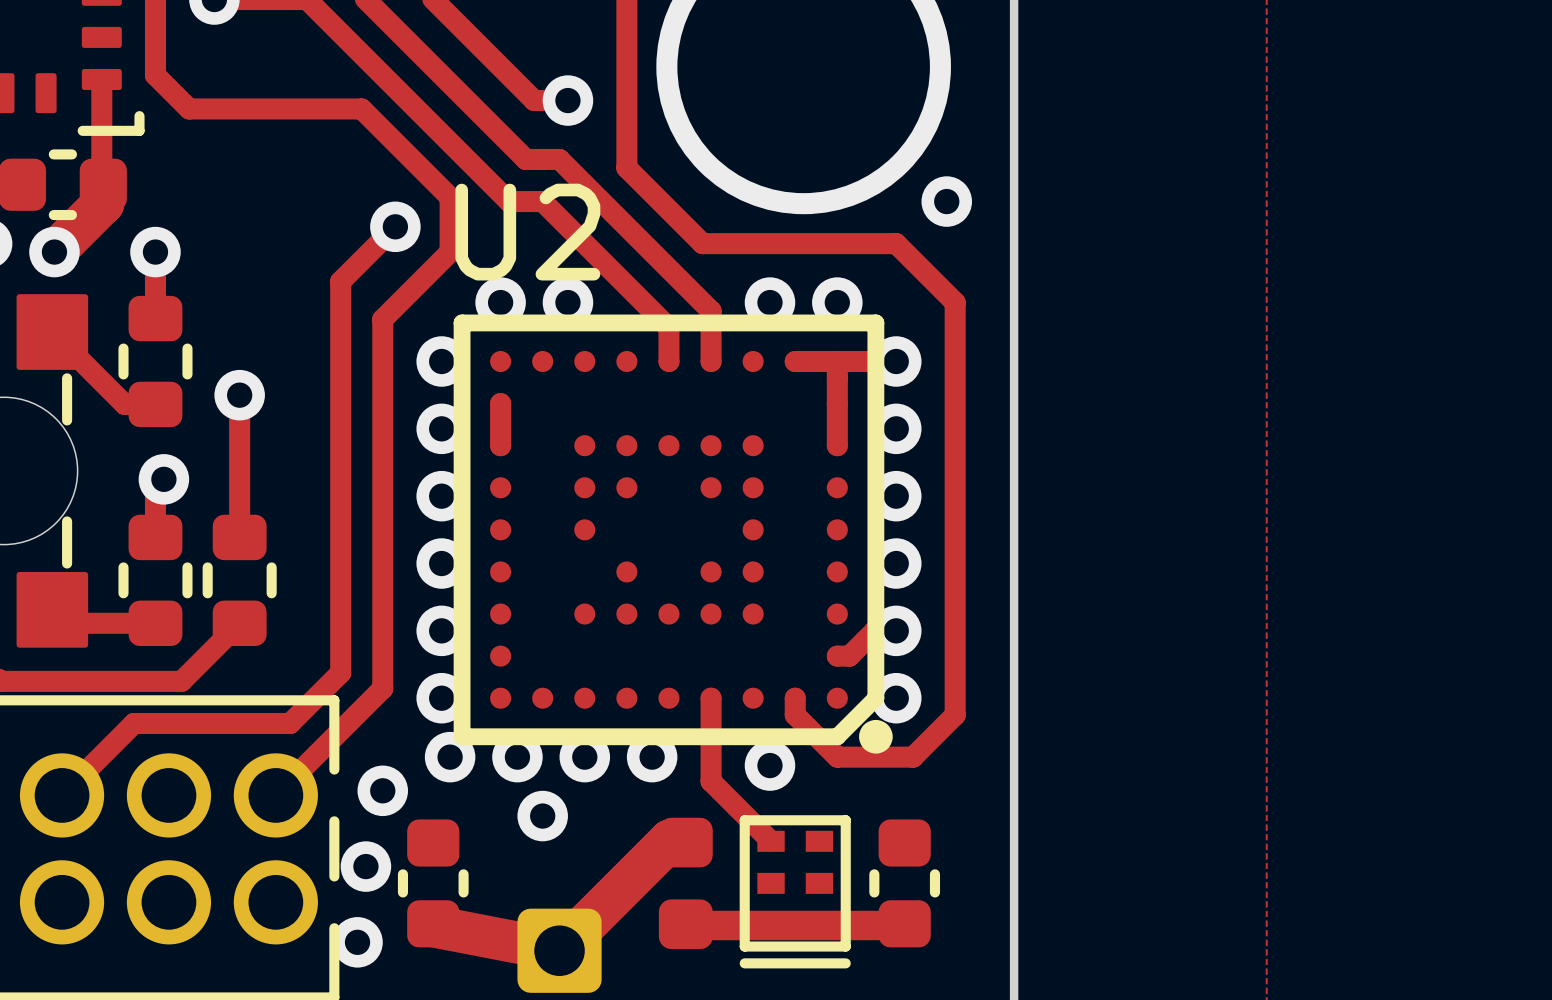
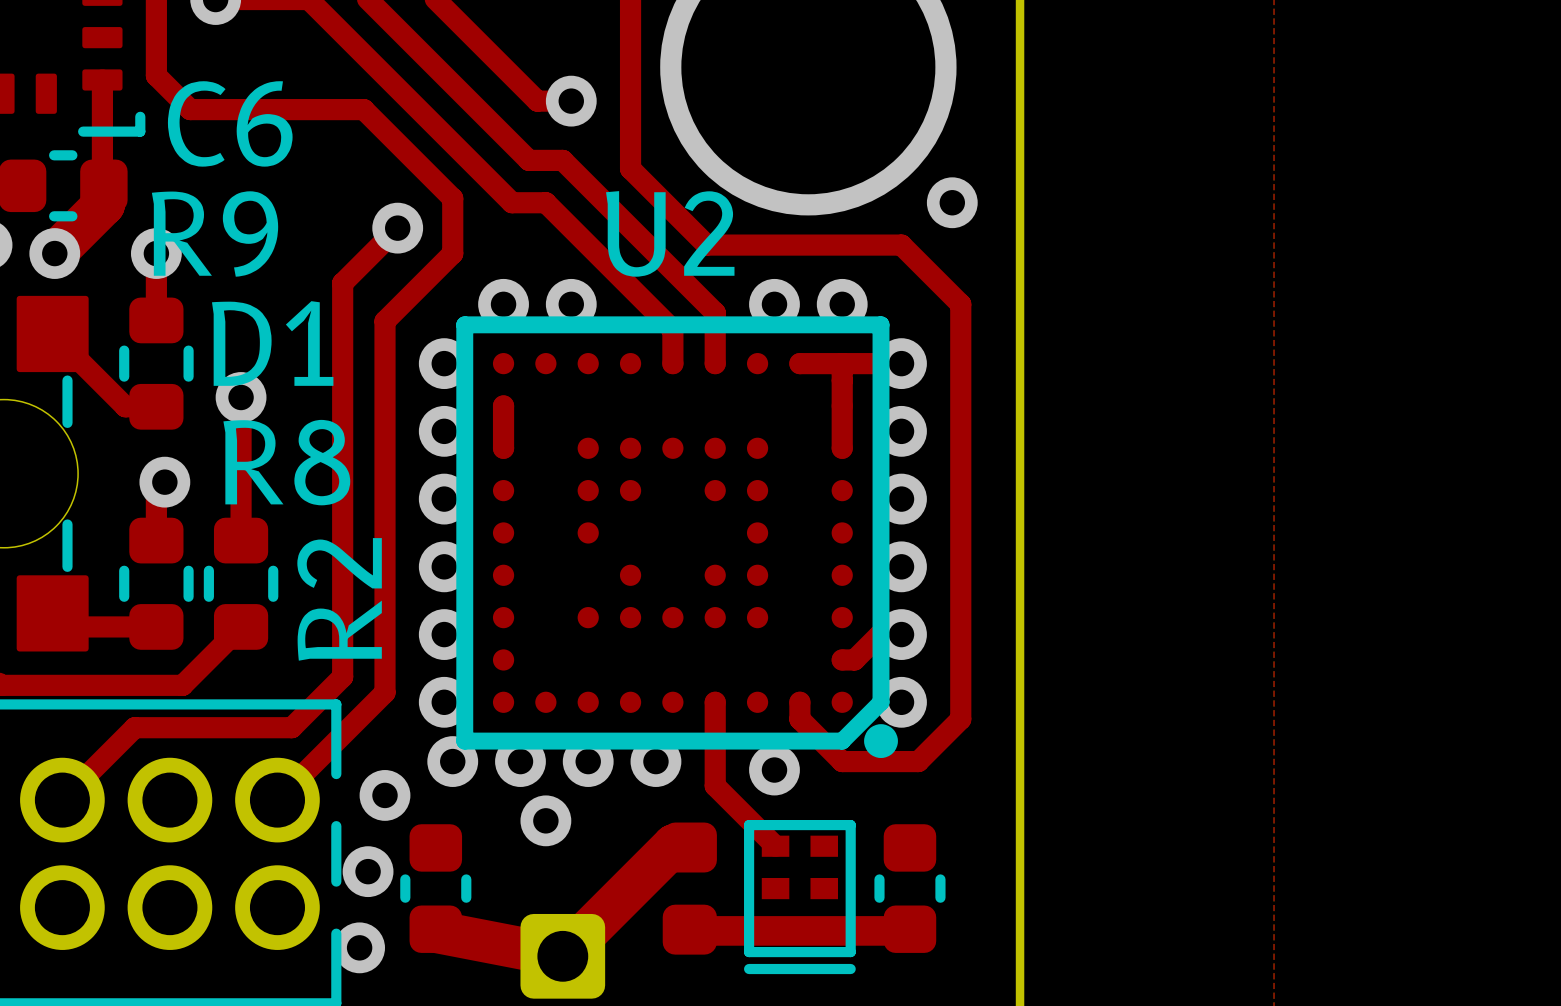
C6 name: none -> C6 (230, 123)
R9 name: none -> R9 (215, 234)
U2 name position: U2 (527, 232) -> U2 (670, 233)
D1 name: none -> D1 (272, 343)
R8 name: none -> R8 (286, 462)
R2 name: none -> R2 (339, 599)

